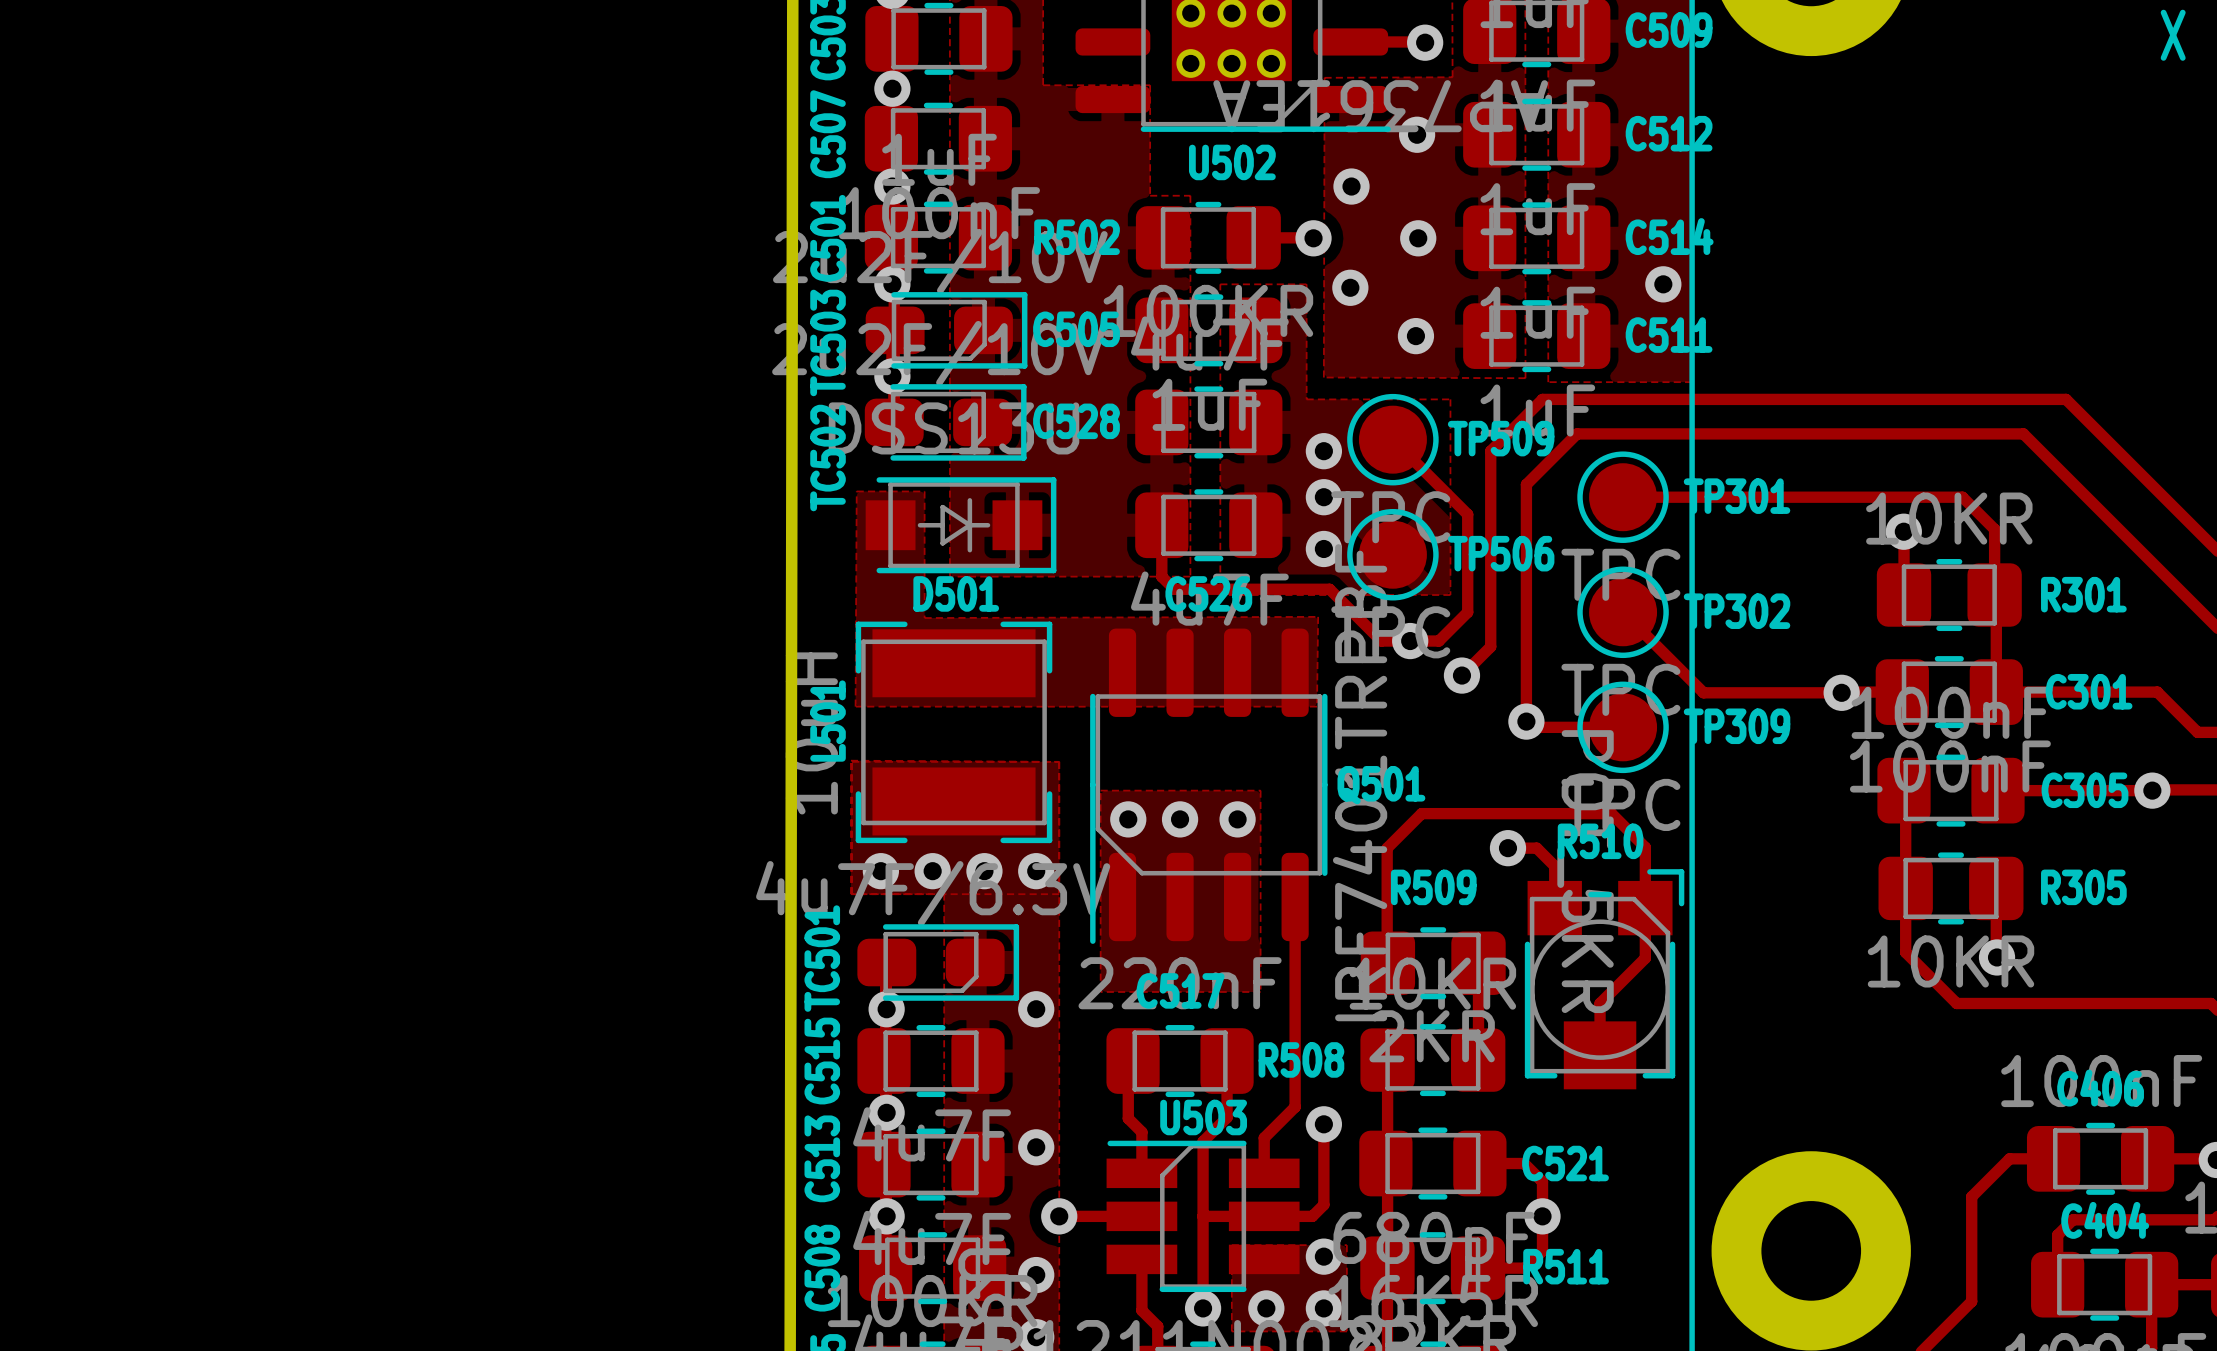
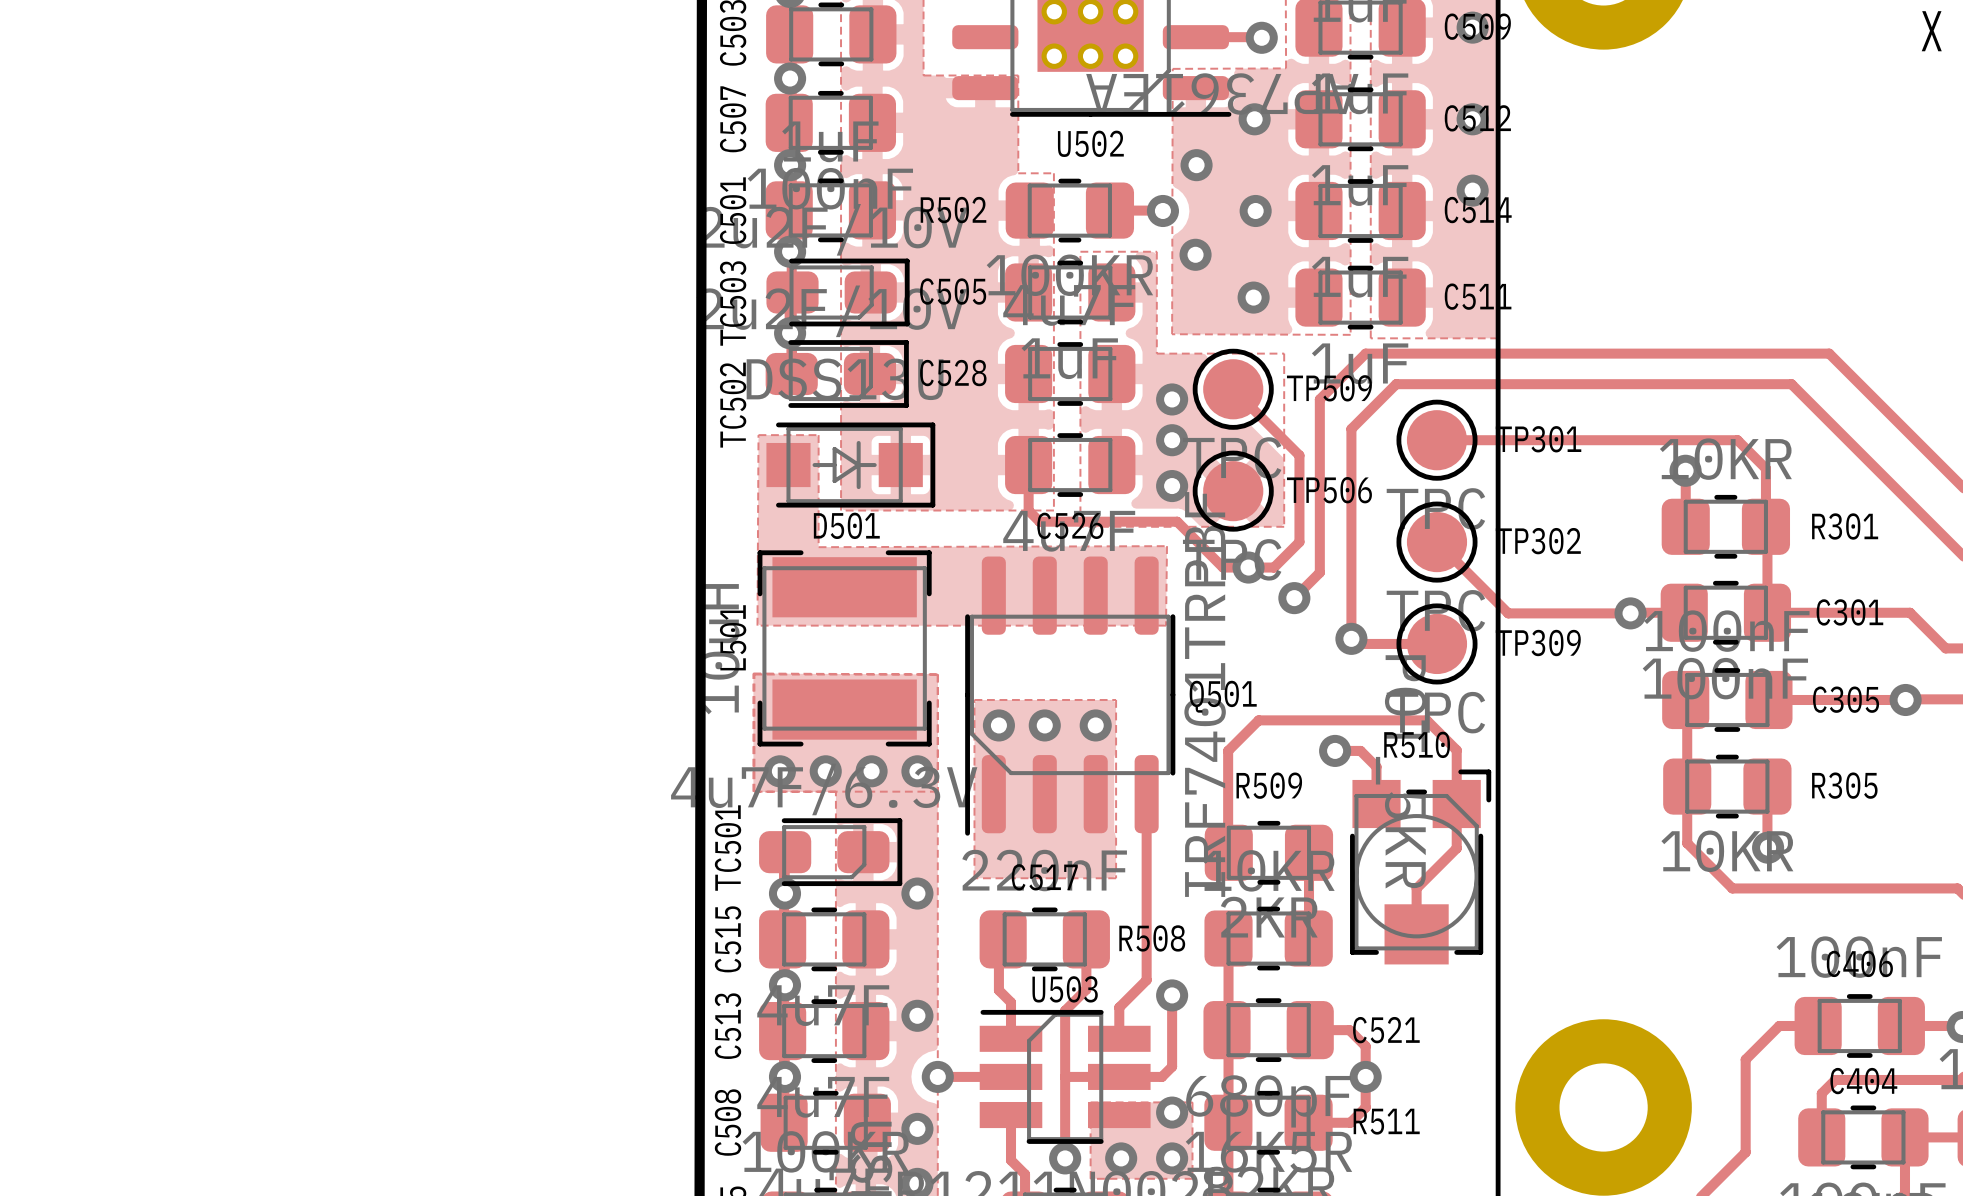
via: none -> (1472, 27)
via: none -> (1472, 119)
via position: (1663, 284) -> (1472, 190)

